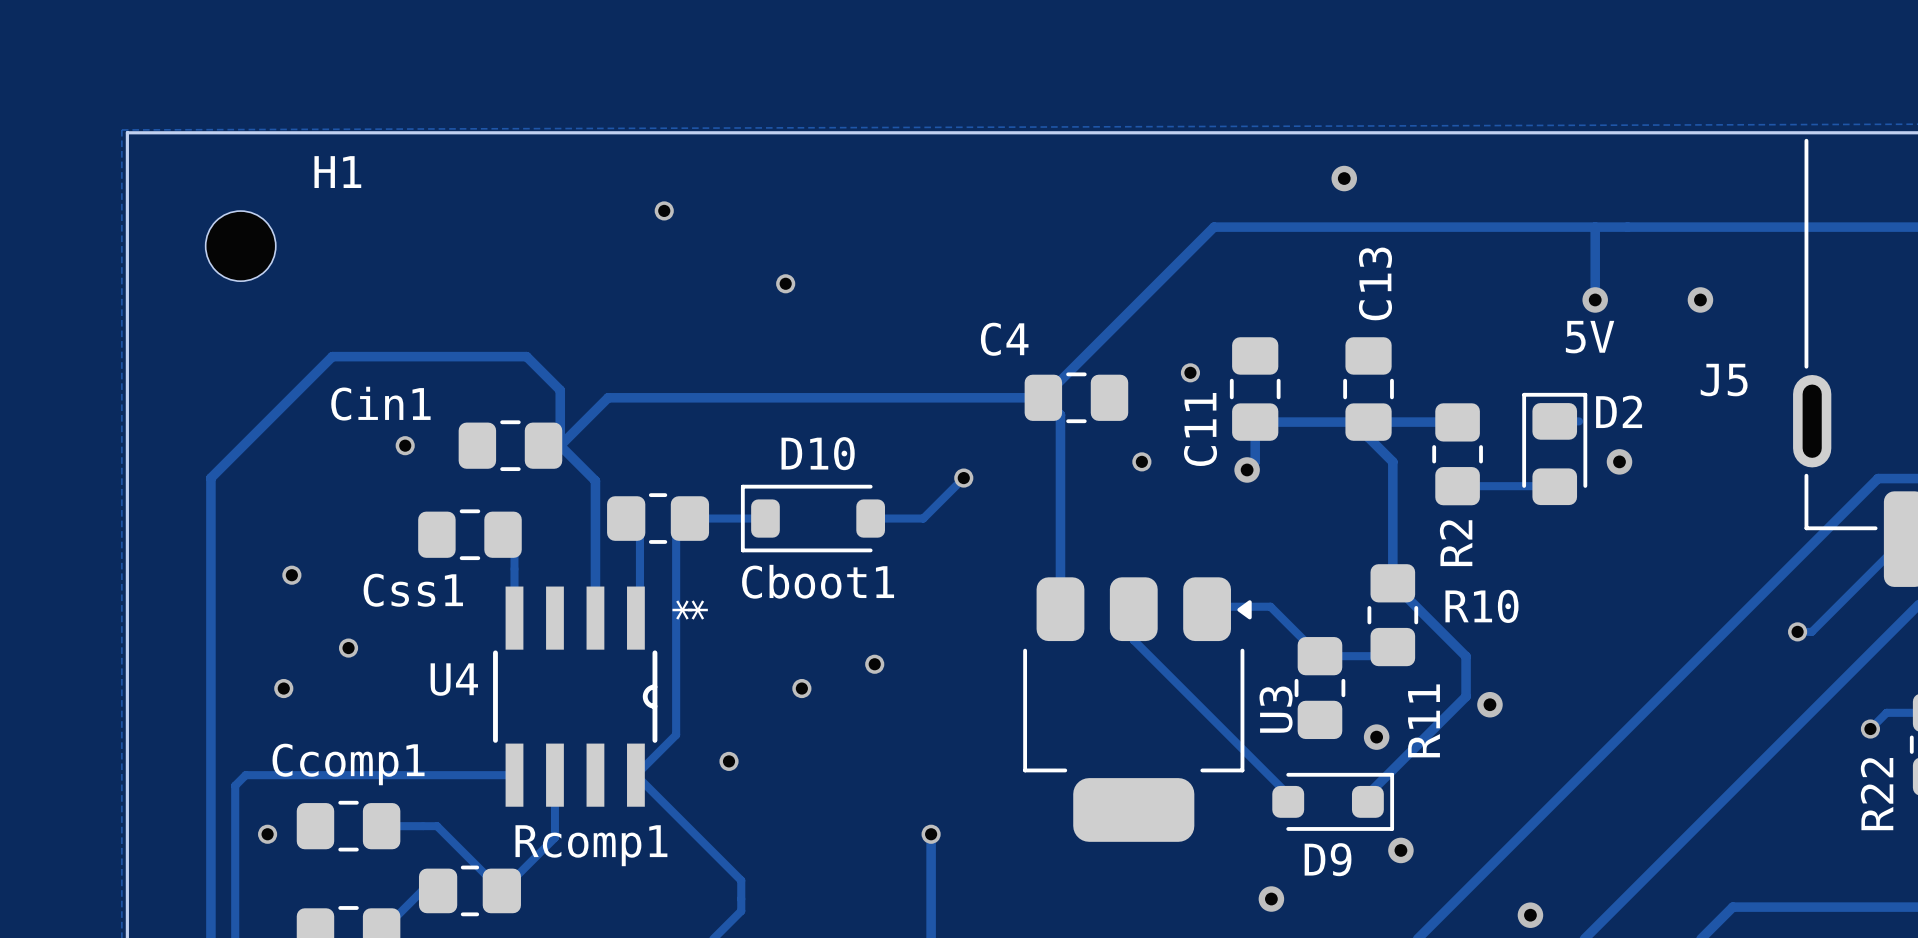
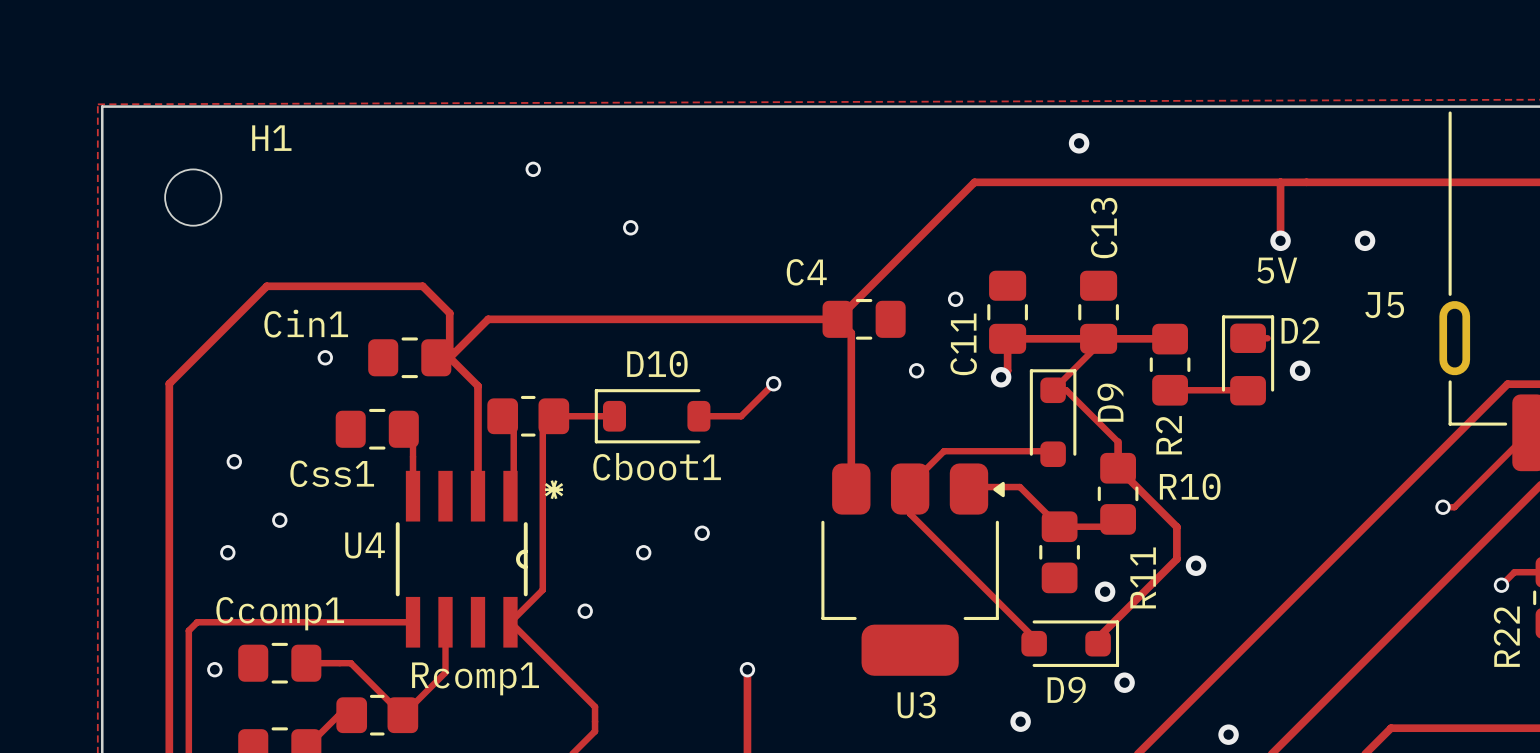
track: (1368, 429) (1368, 437) (1392, 461) (1392, 550) -> (1098, 344) (1053, 390) (1066, 390) (1118, 442)
D9: none -> (1053, 418)
track: none -> (1053, 454) (1050, 451) (944, 451) (910, 485)
U3 name rotation: 0° (1276, 709) -> 90° clockwise (916, 705)
U3 name position: U3 (1276, 709) -> U3 (916, 705)

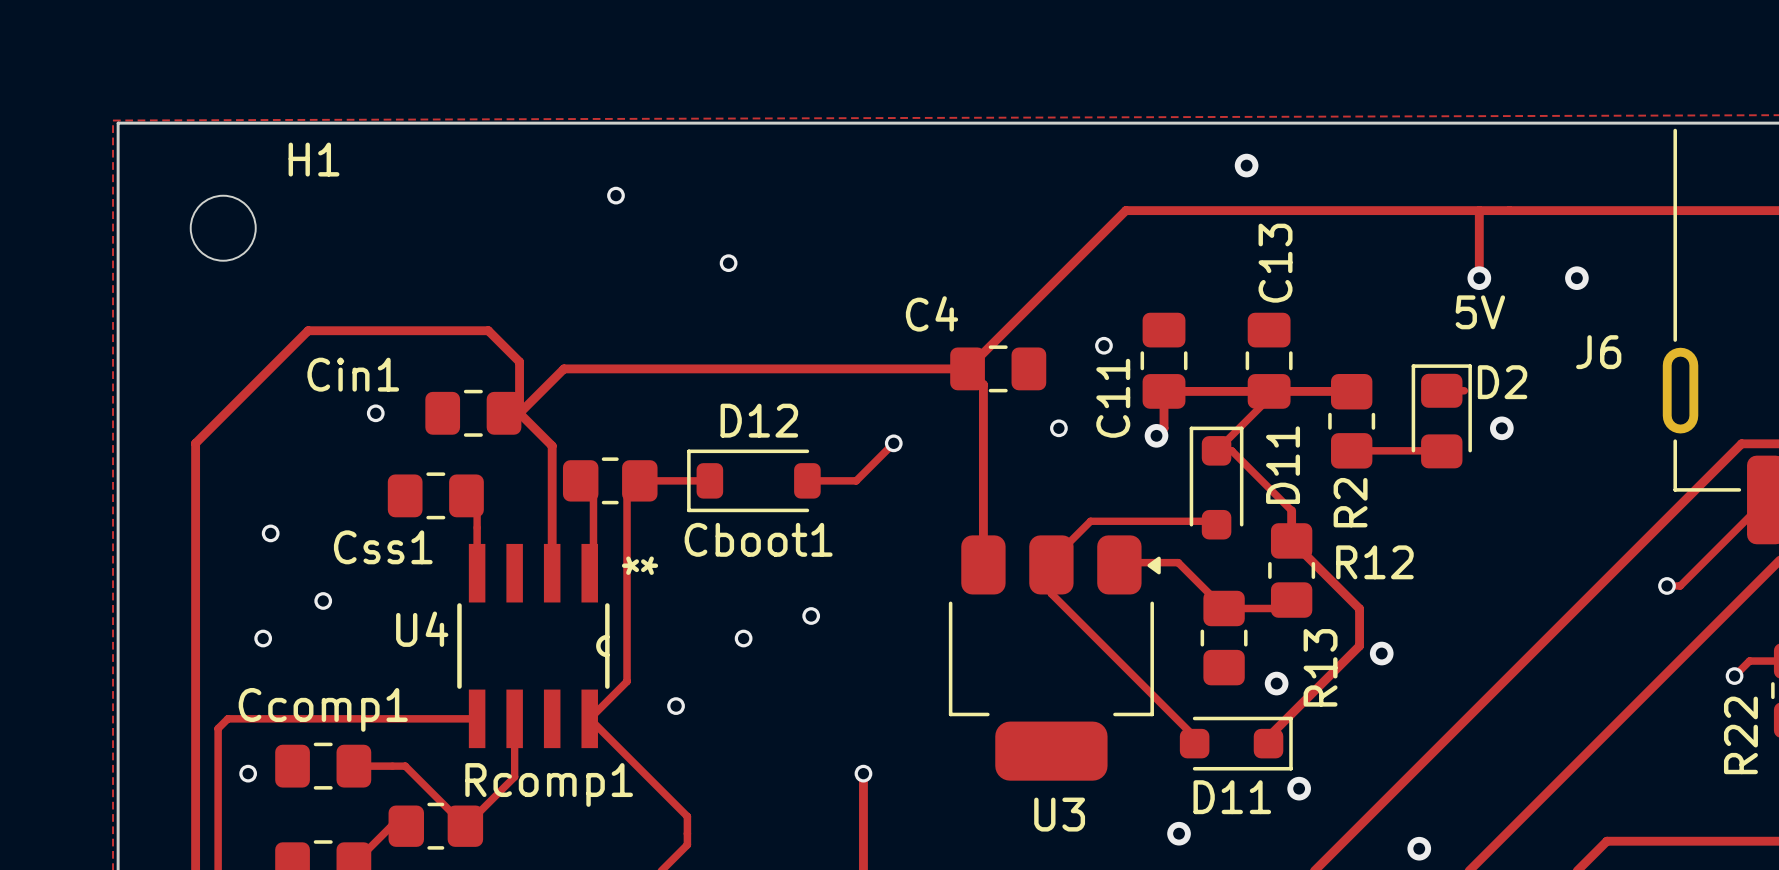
J5 name: J5 (1384, 305) -> J6 (1598, 352)
D10 name: D10 (657, 364) -> D12 (759, 420)
D9 name: D9 (1110, 402) -> D11 (1283, 465)
R10 name: R10 (1190, 486) -> R12 (1374, 562)
R11 name: R11 (1143, 577) -> R13 (1320, 667)
D9 name: D9 (1066, 689) -> D11 (1232, 797)

